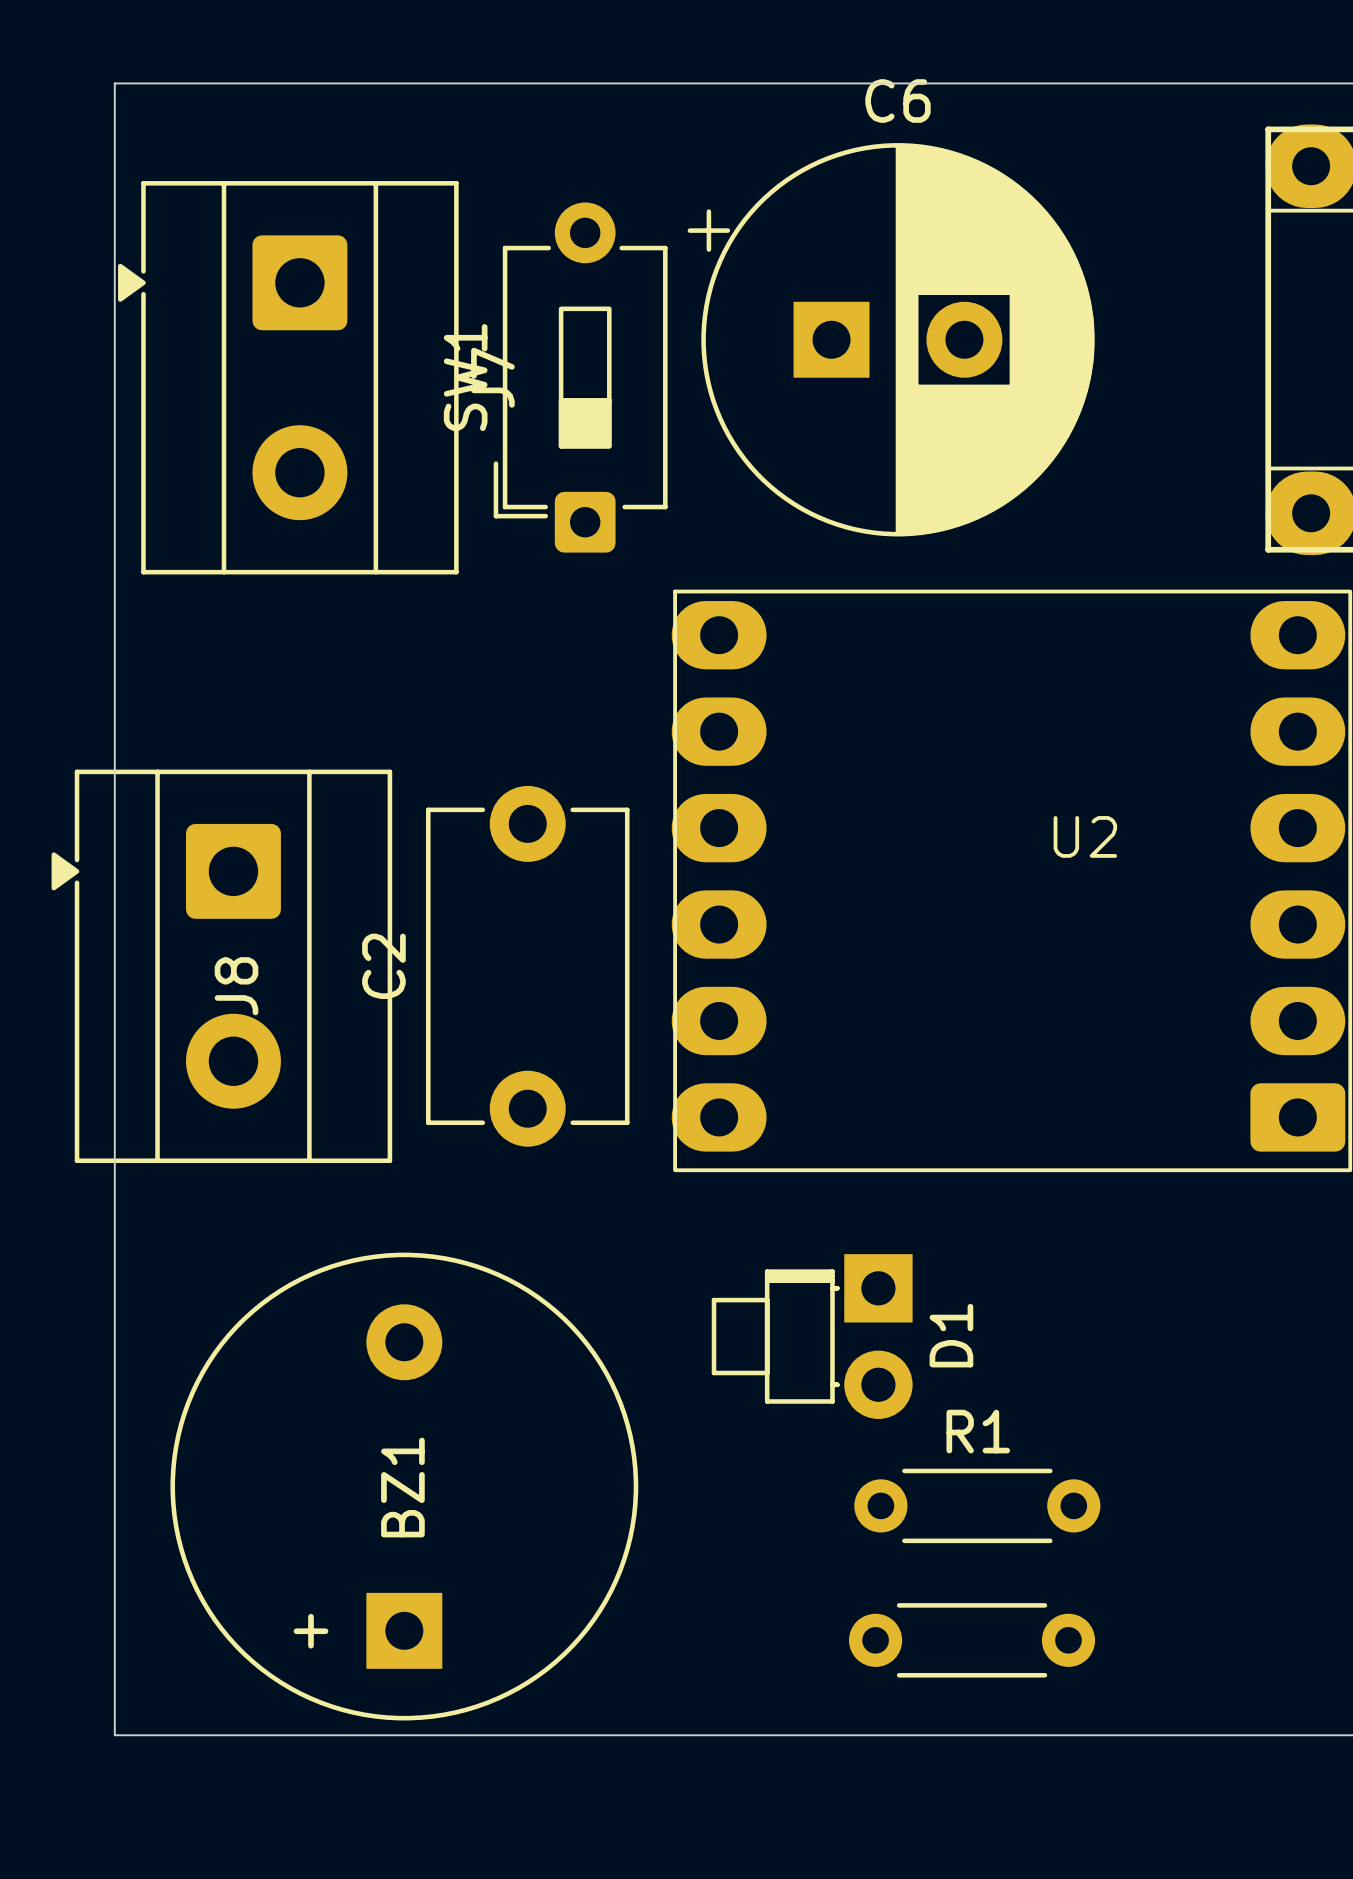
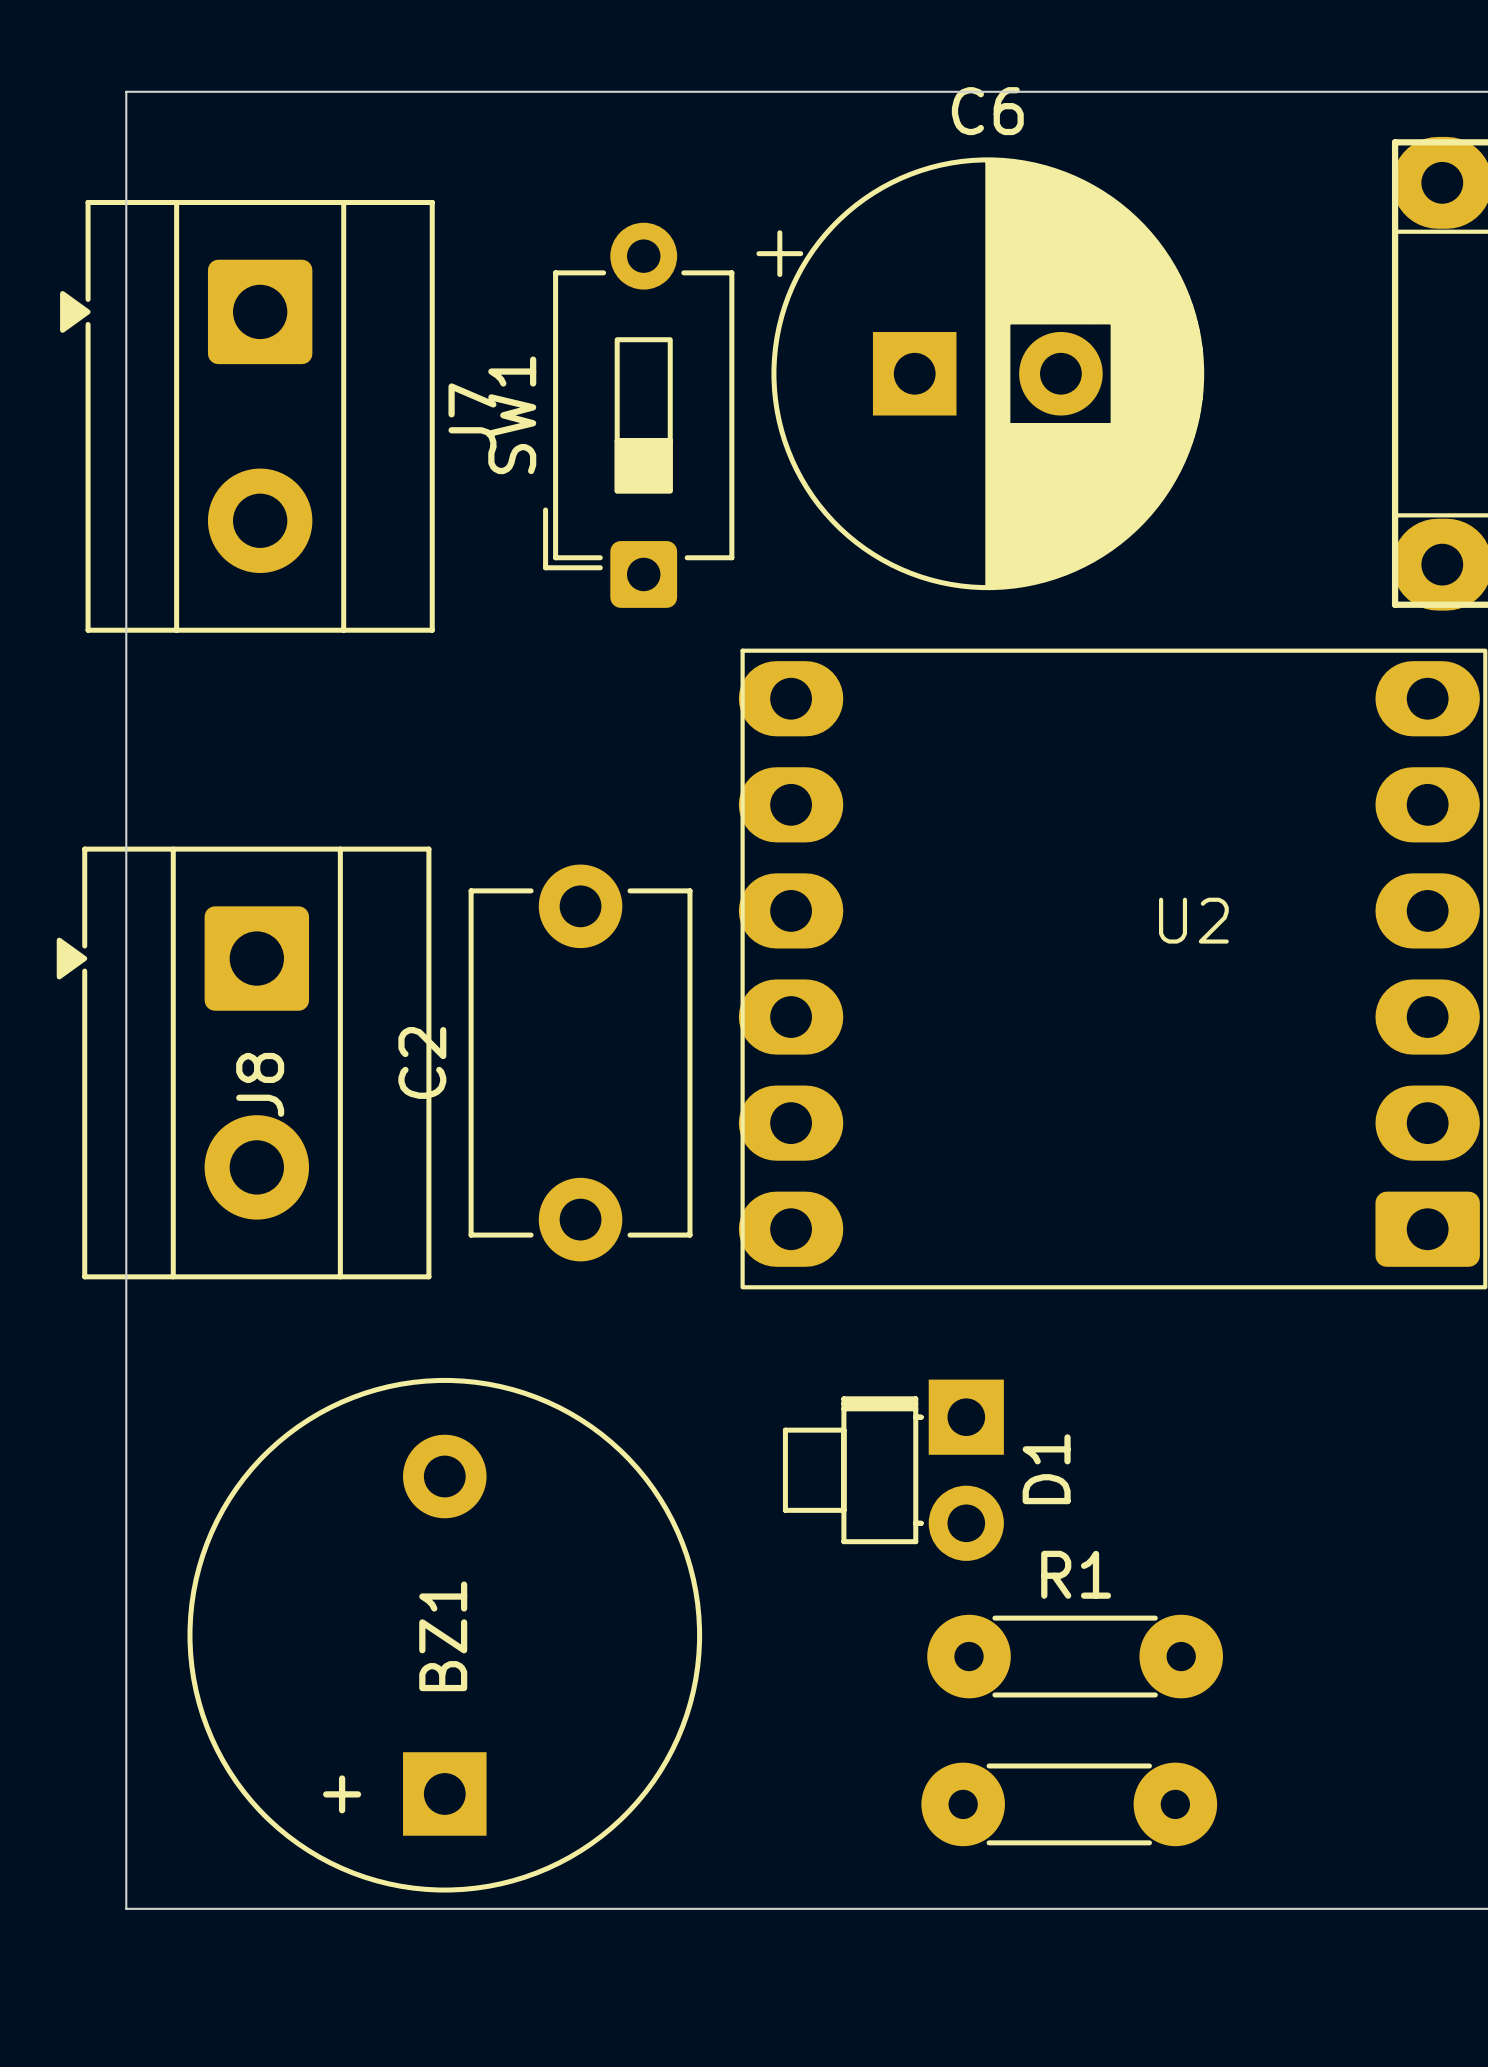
J7 position: (288, 377) -> (247, 416)
R1 footprint: [854, 1468, 1101, 1544] -> [927, 1614, 1223, 1699]
part footprint: [849, 1603, 1096, 1678] -> [921, 1762, 1218, 1847]

